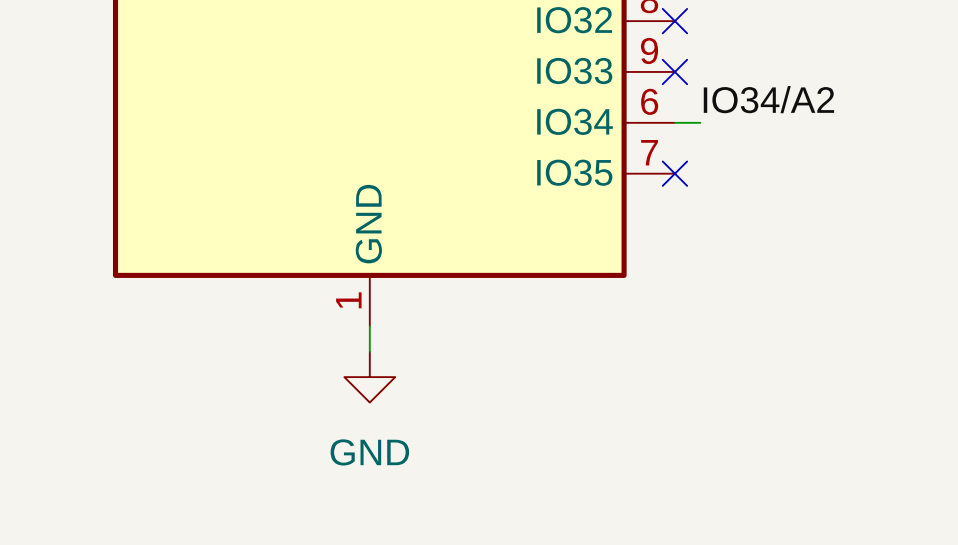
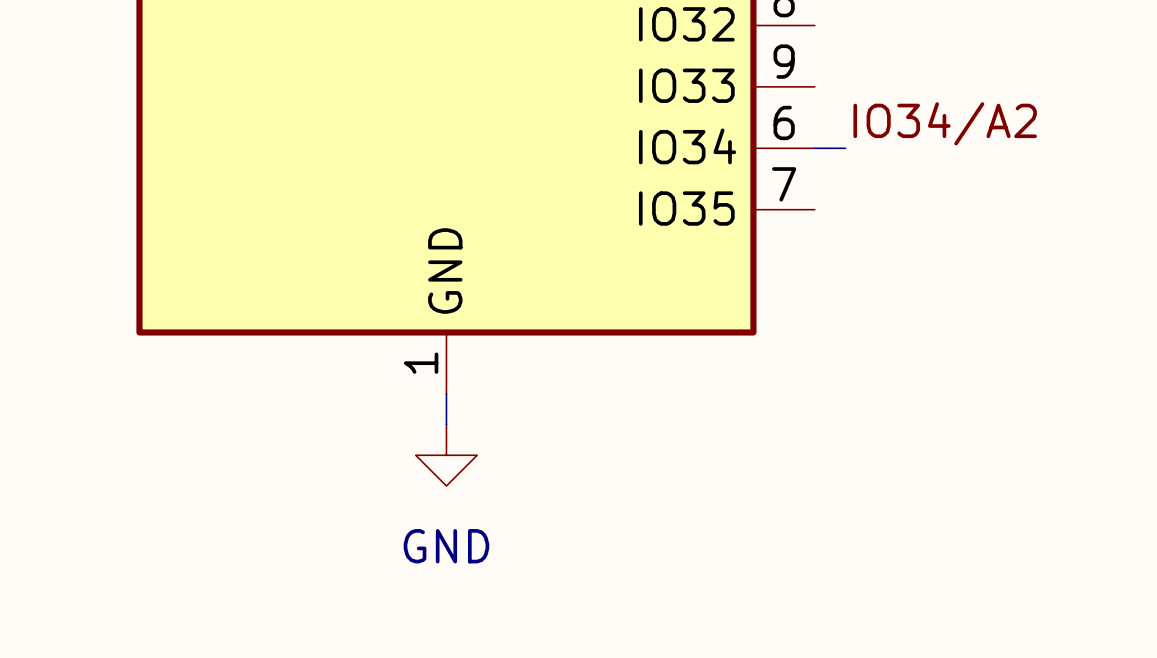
no-connect mark: (674, 21) -> none
no-connect mark: (674, 71) -> none
no-connect mark: (674, 173) -> none

